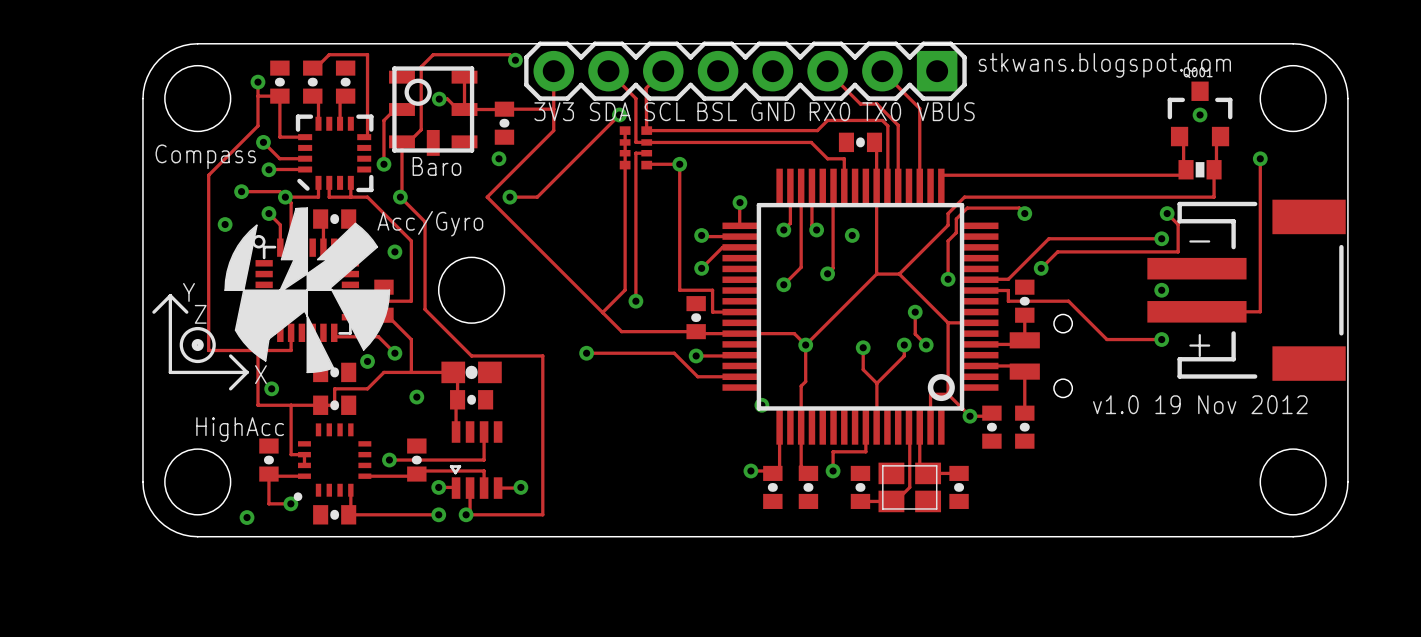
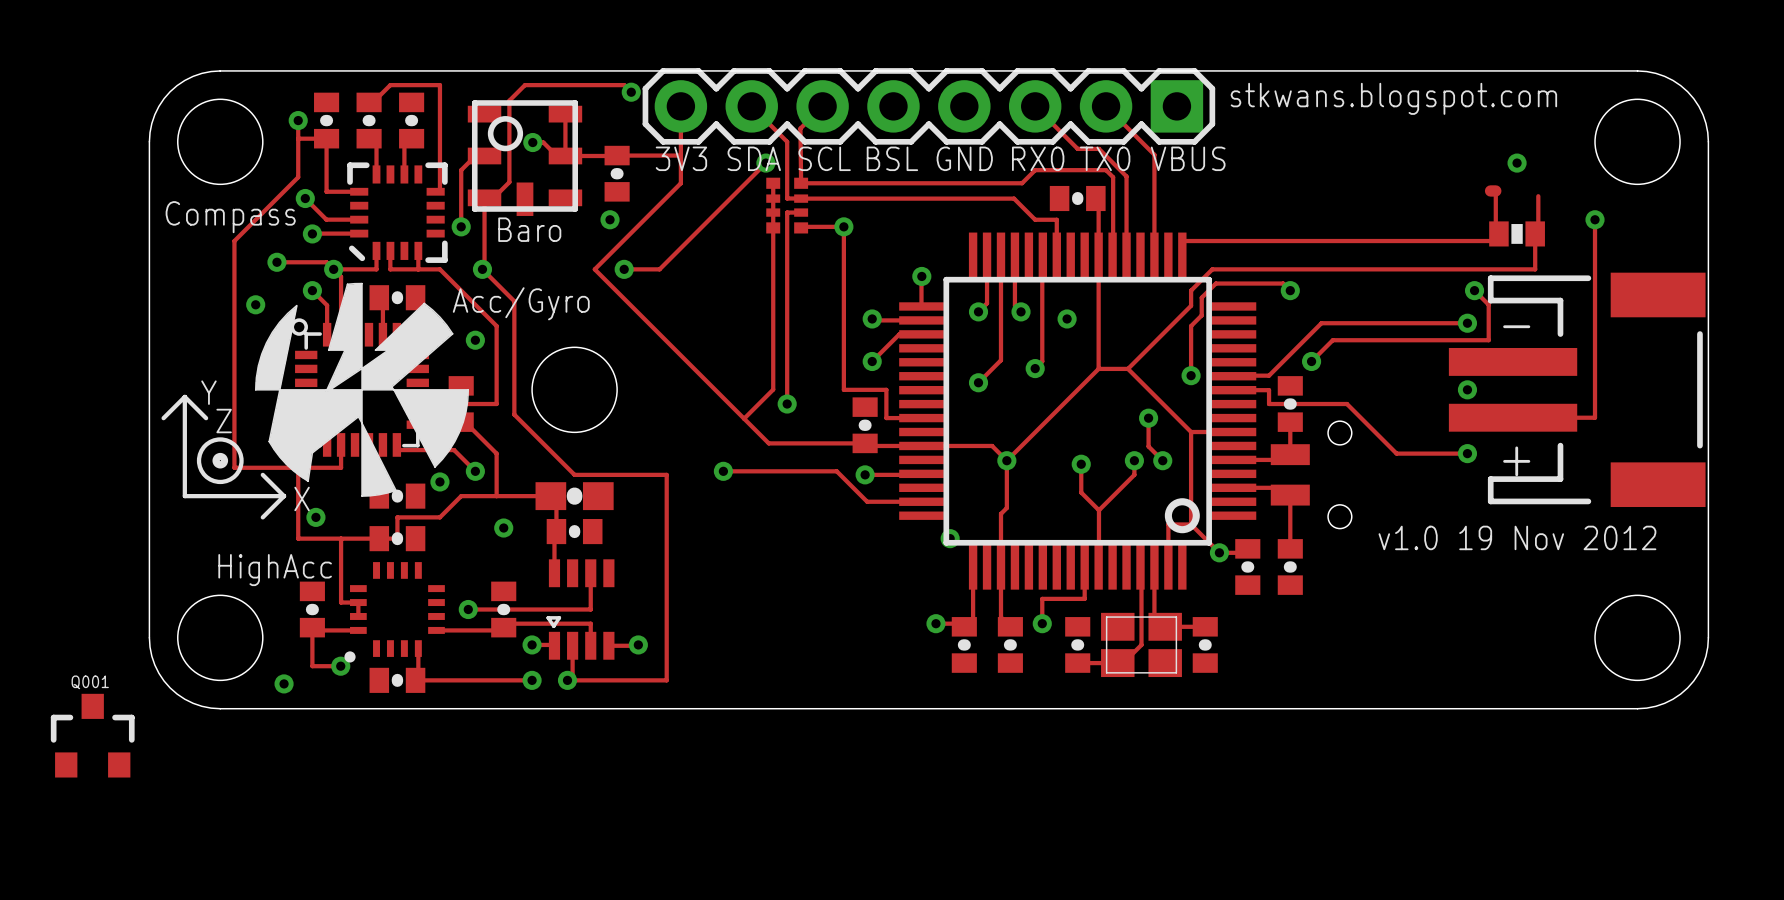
Q001 position: (1200, 113) -> (92, 735)

